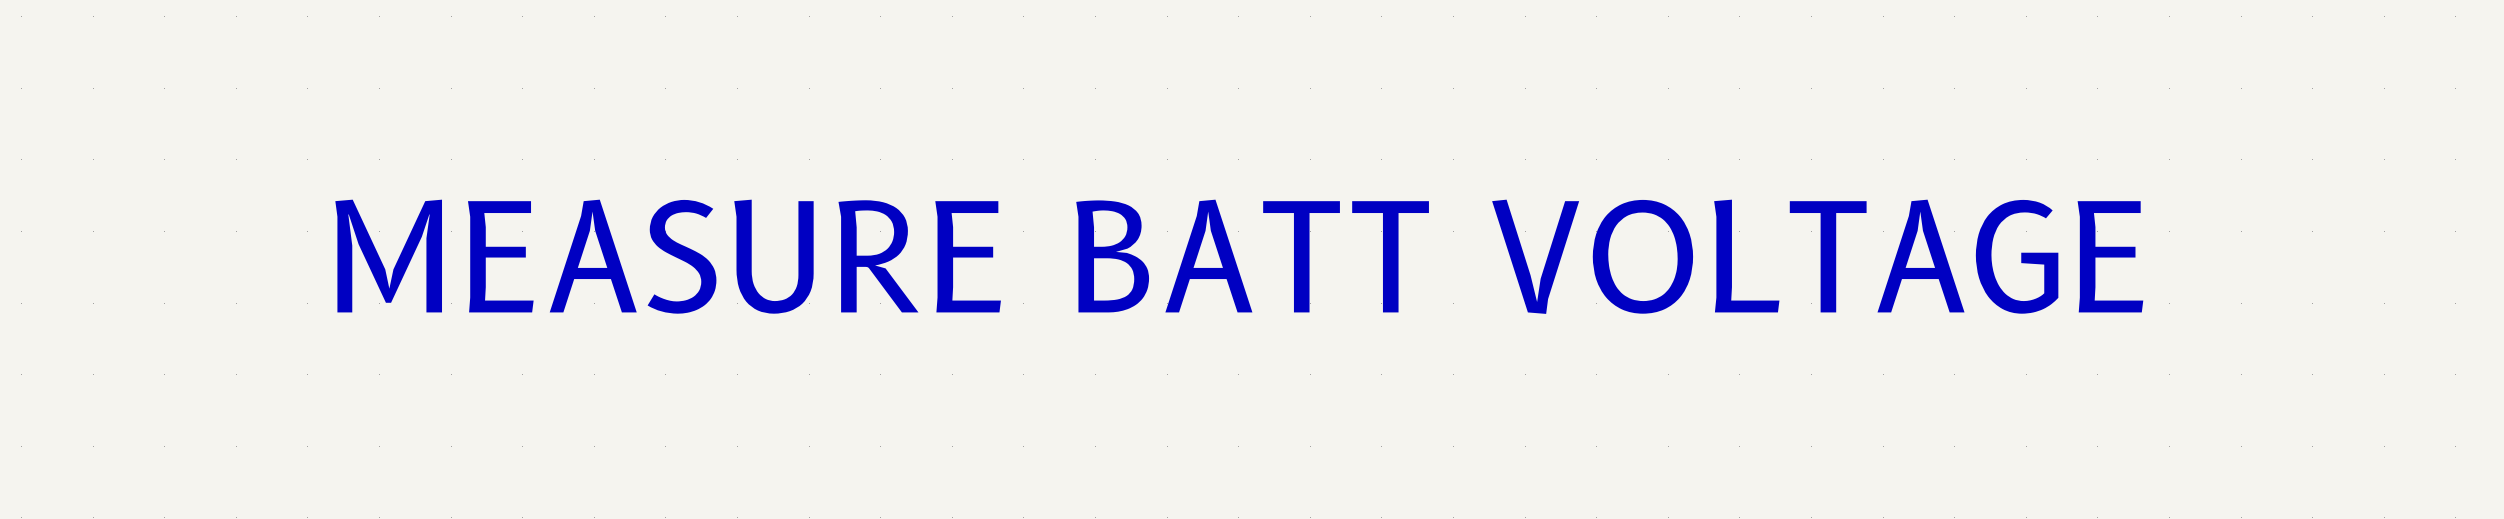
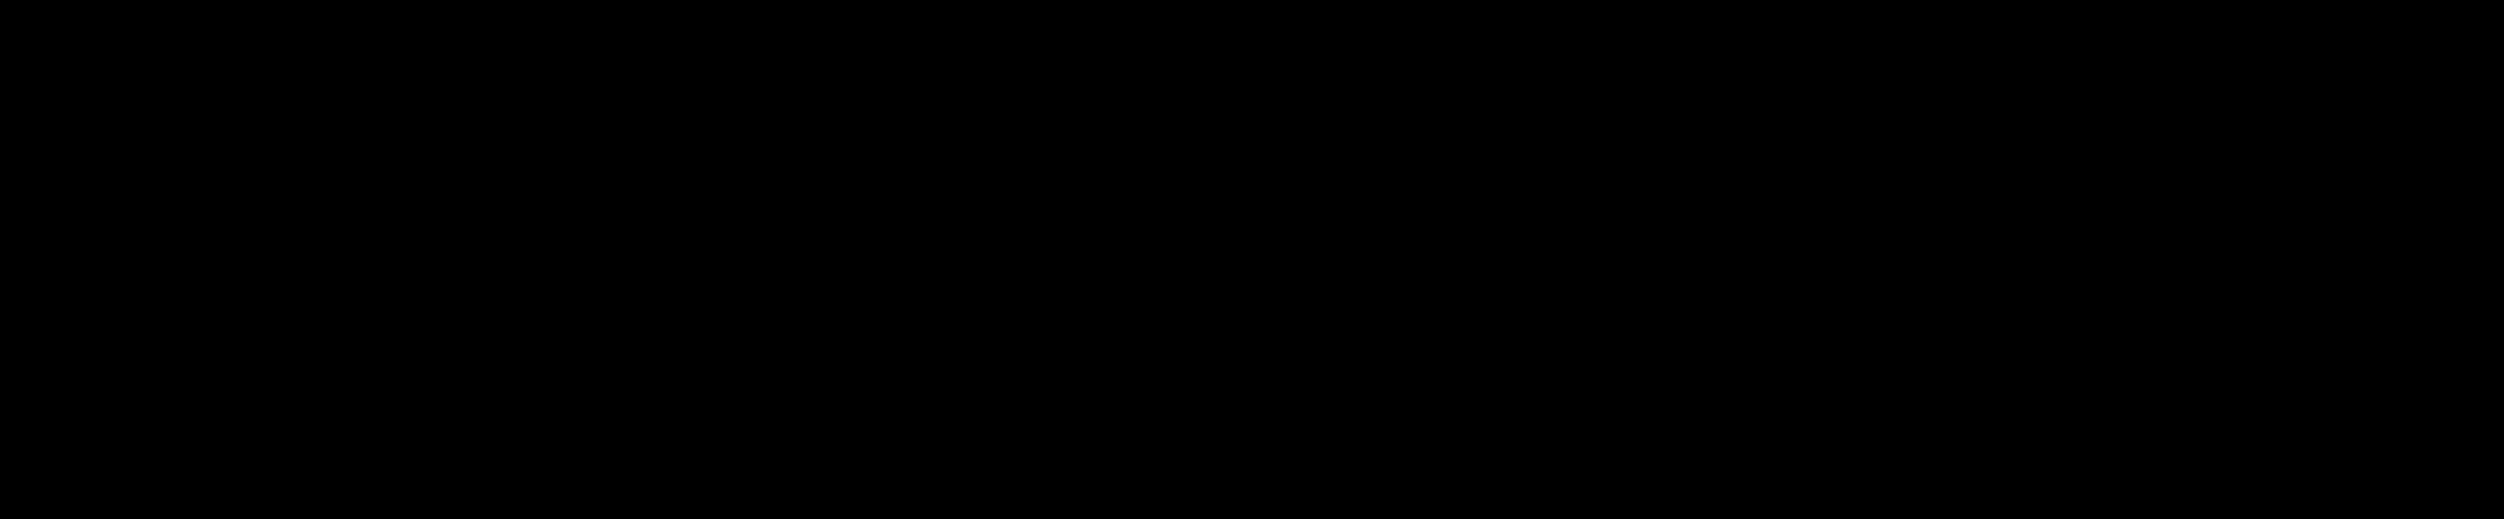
text: MEASURE BATT VOLTAGE (1239, 256) -> none

